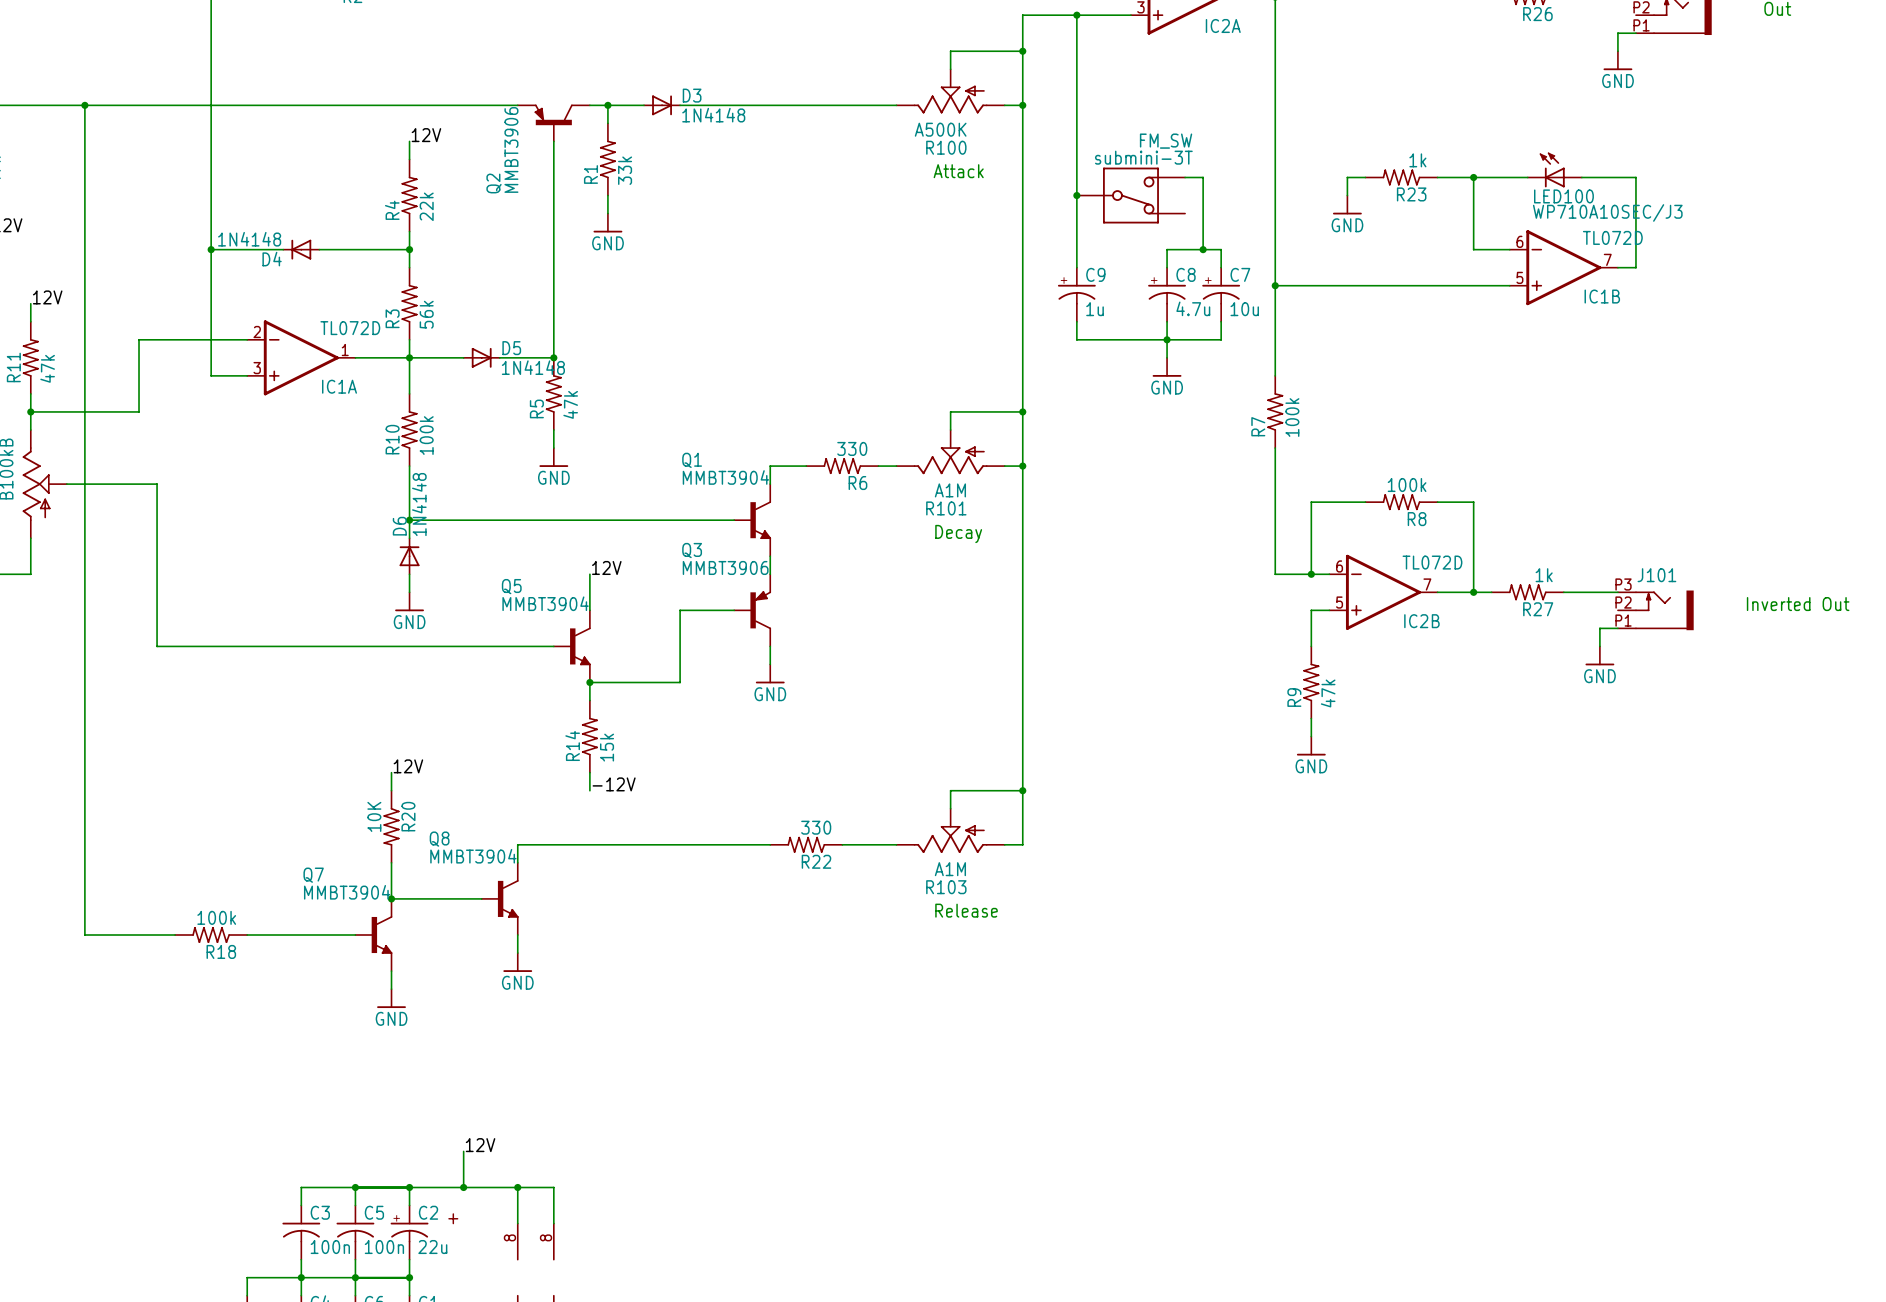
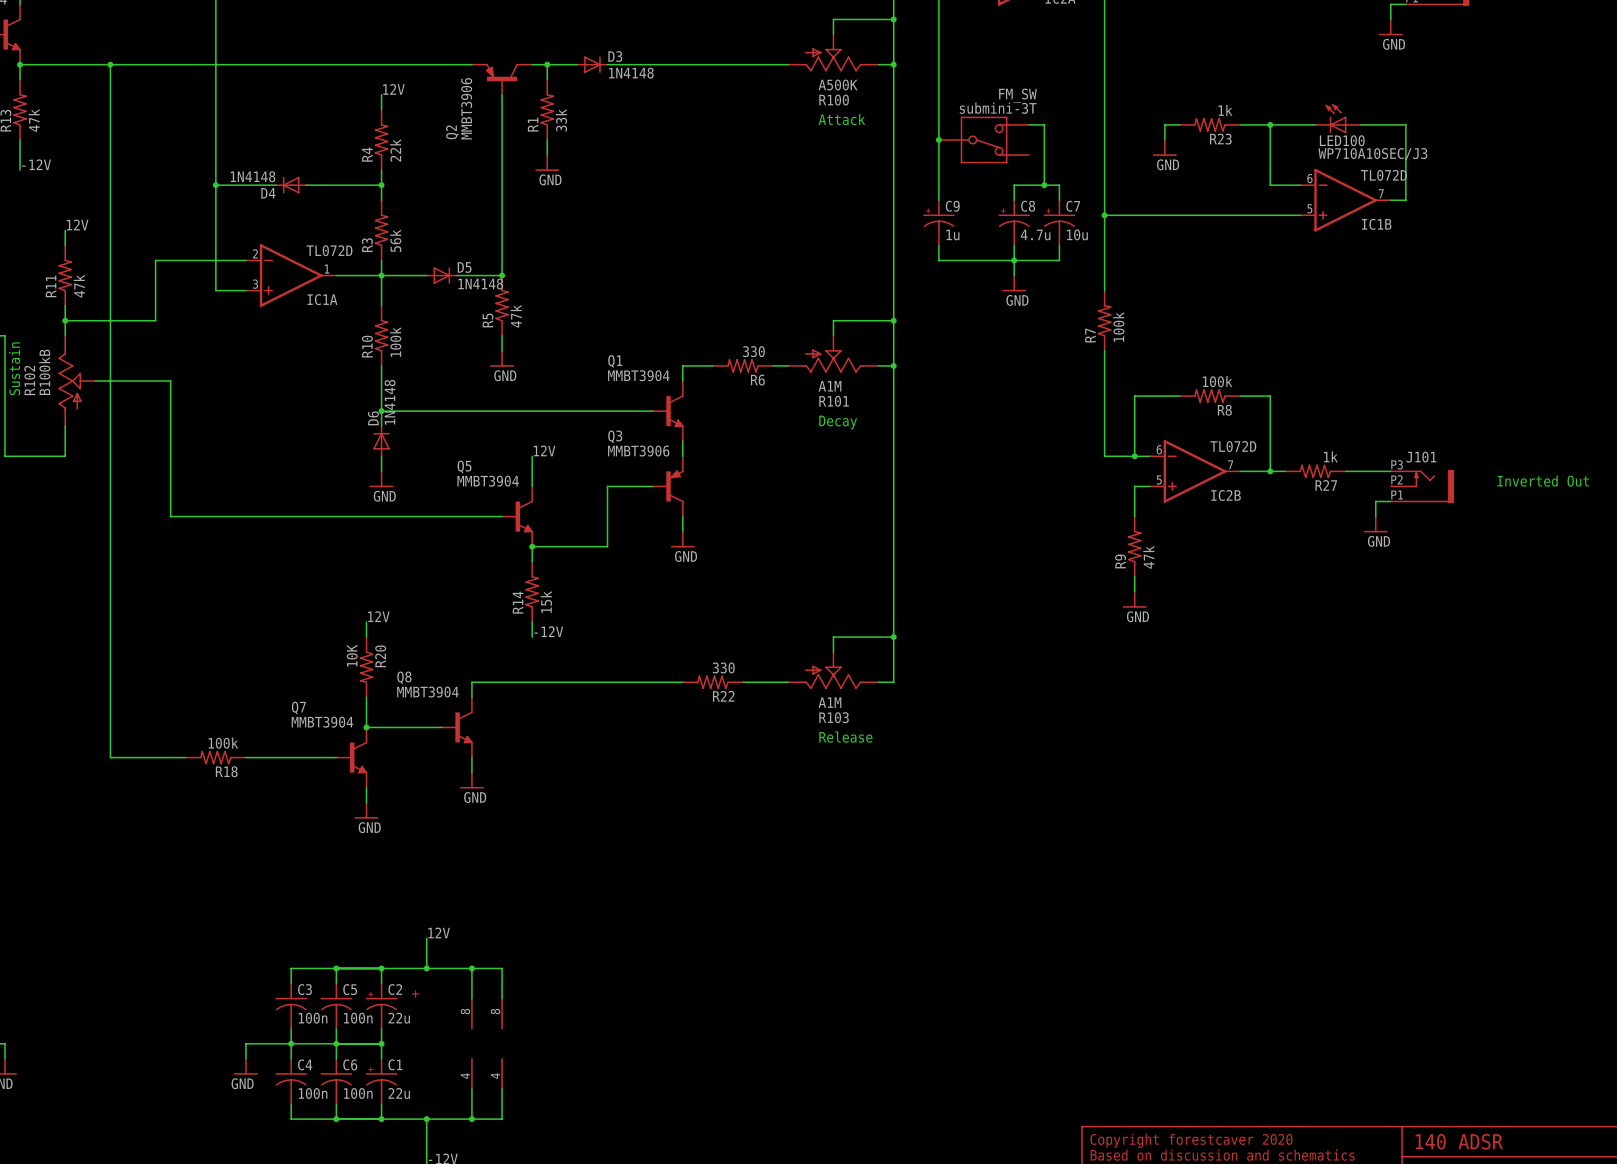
R100 flip: as is (950, 99) -> left-right (833, 59)
R101 flip: as is (950, 460) -> left-right (833, 361)
R103 flip: as is (950, 839) -> left-right (833, 677)

